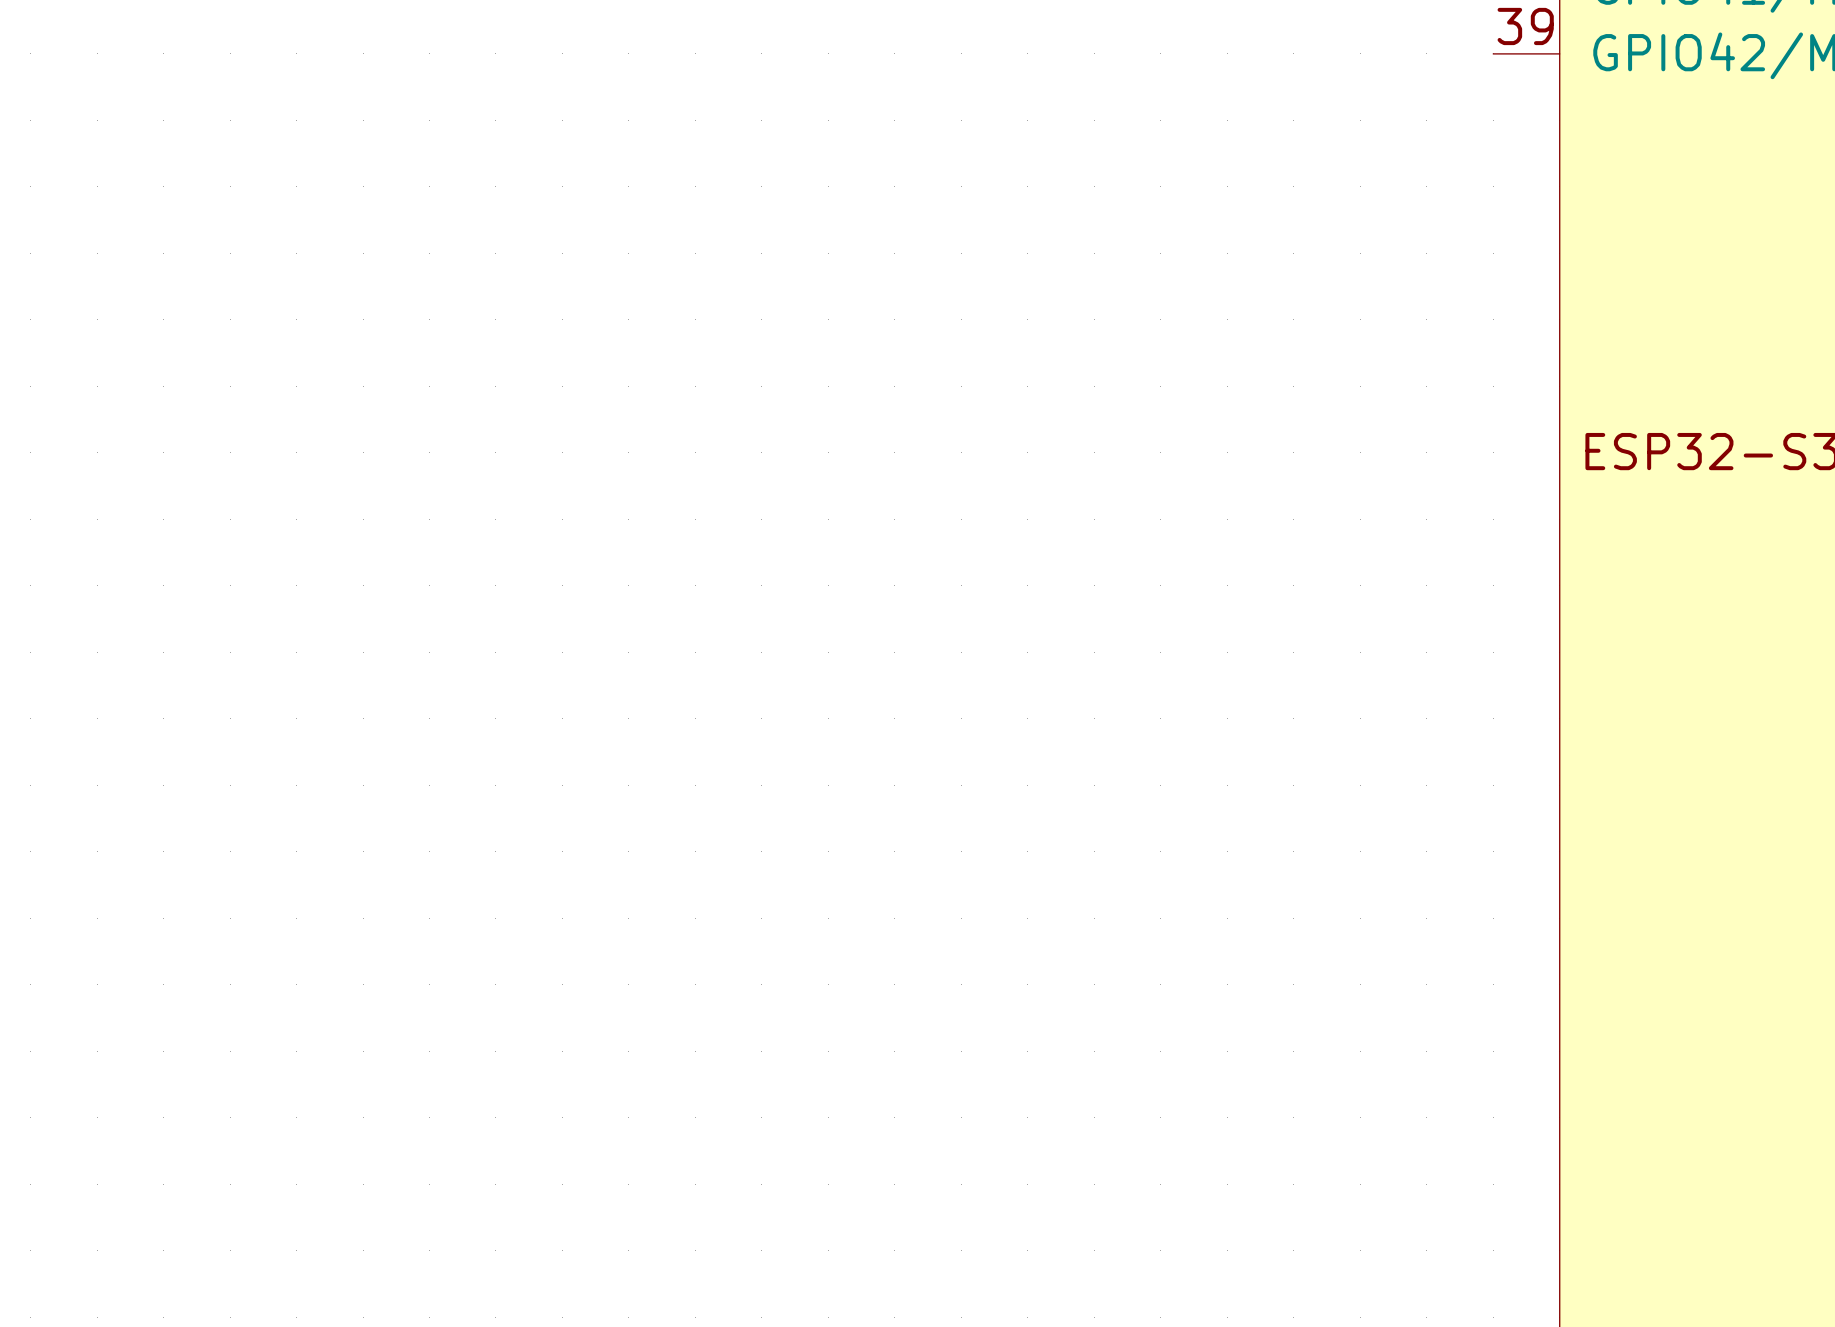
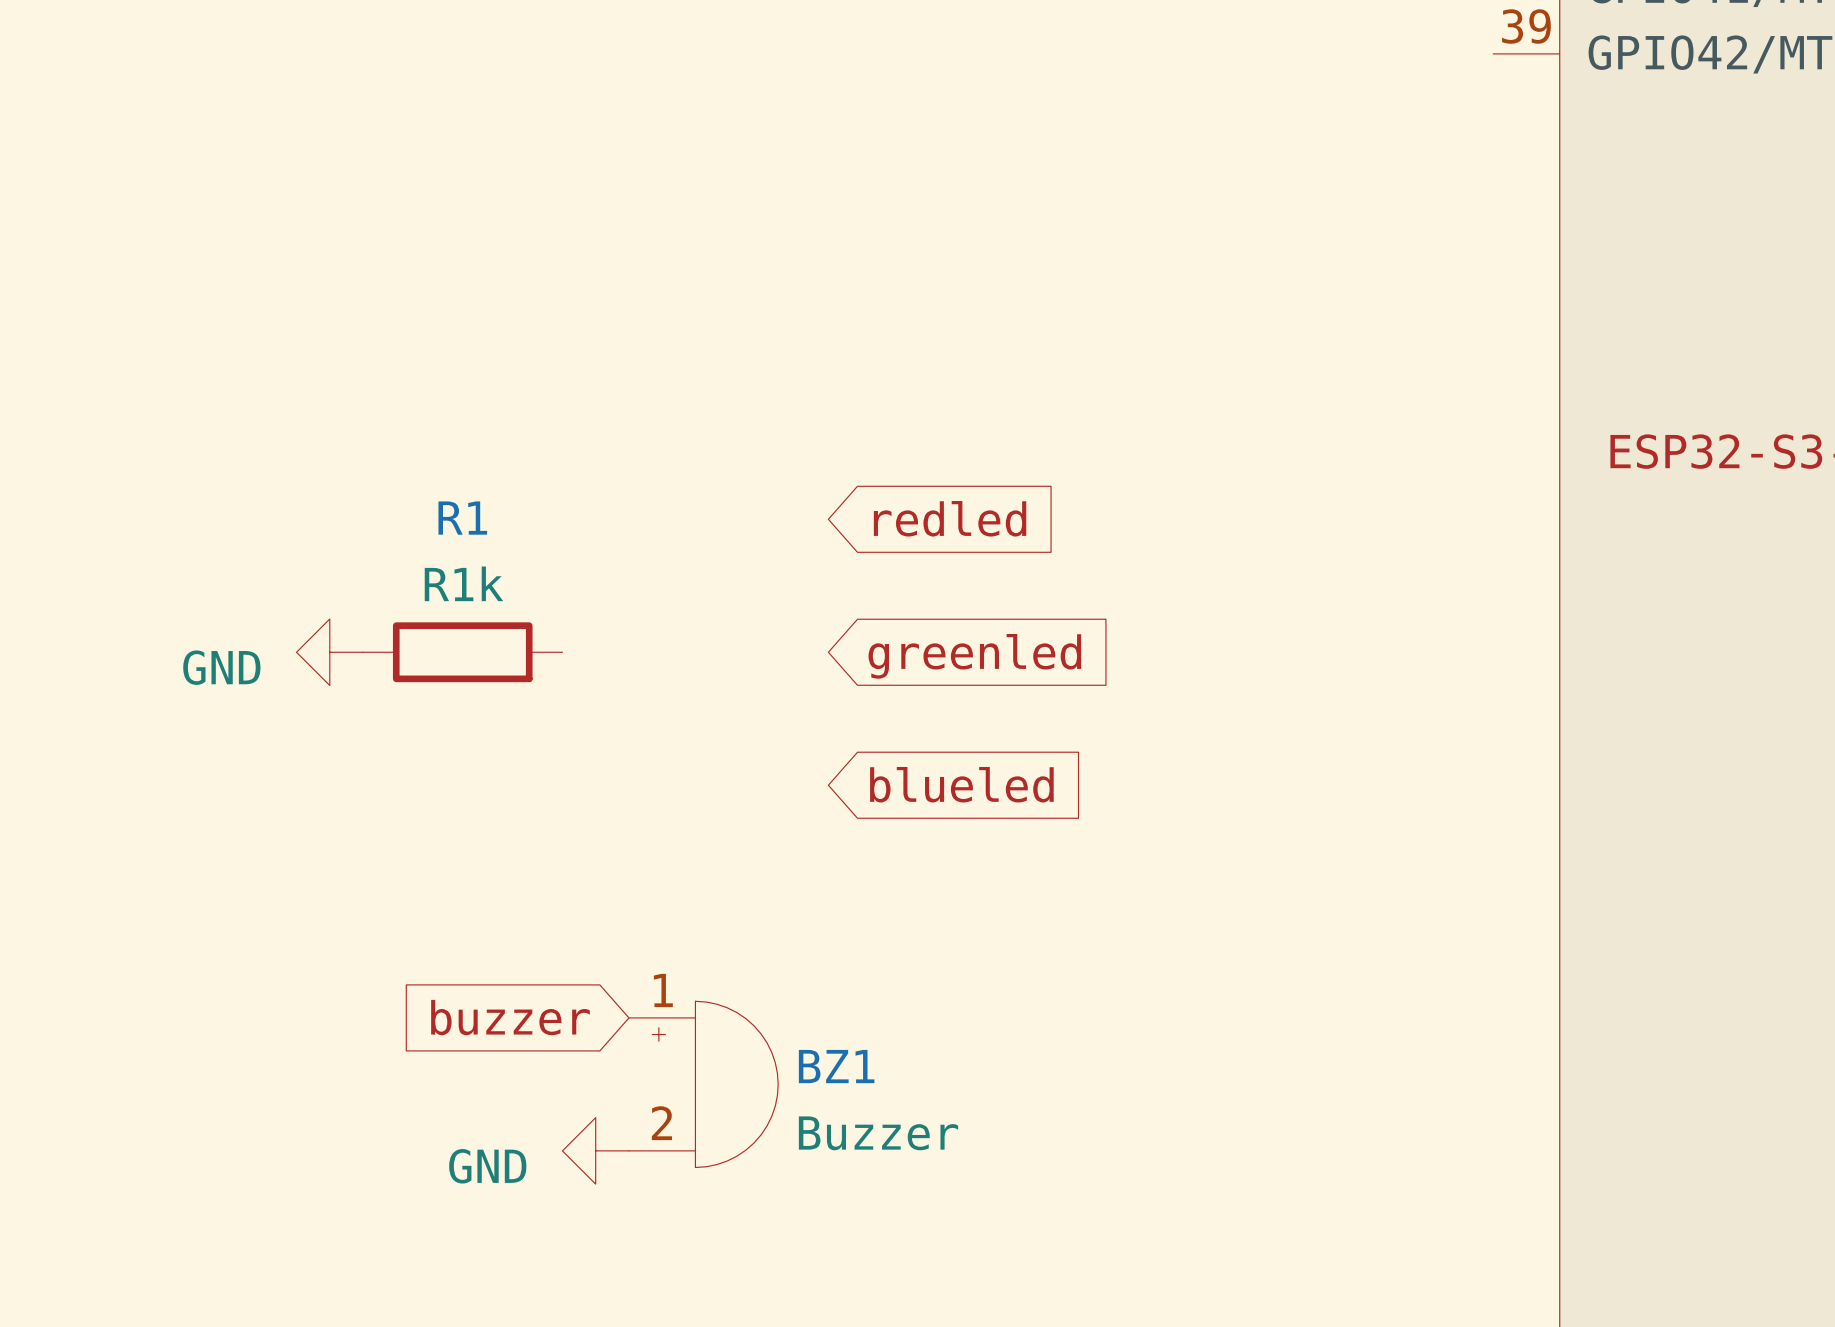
global label: none -> redled (950, 518)
power symbol: none -> GND (329, 652)
R1: none -> R1k (462, 652)
global label: none -> greenled (974, 656)
global label: none -> blueled (961, 784)
global label: none -> buzzer (510, 1017)
BZ1: none -> Buzzer (703, 1084)
power symbol: none -> GND (595, 1150)

